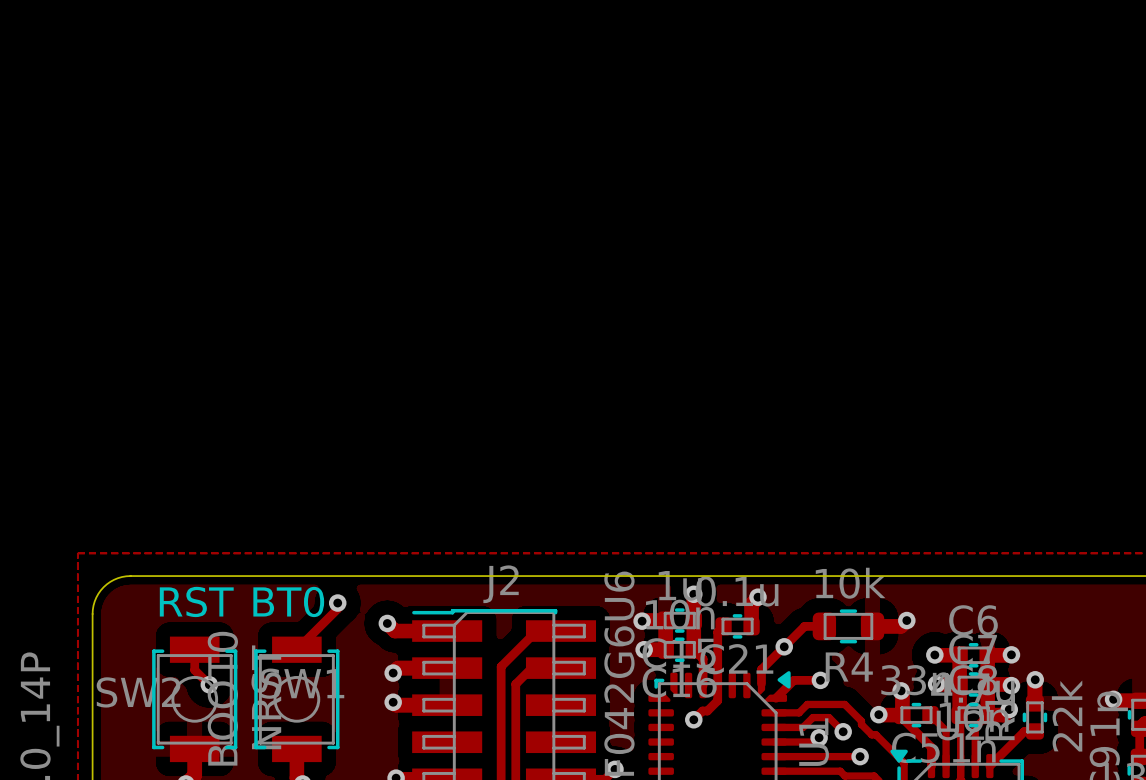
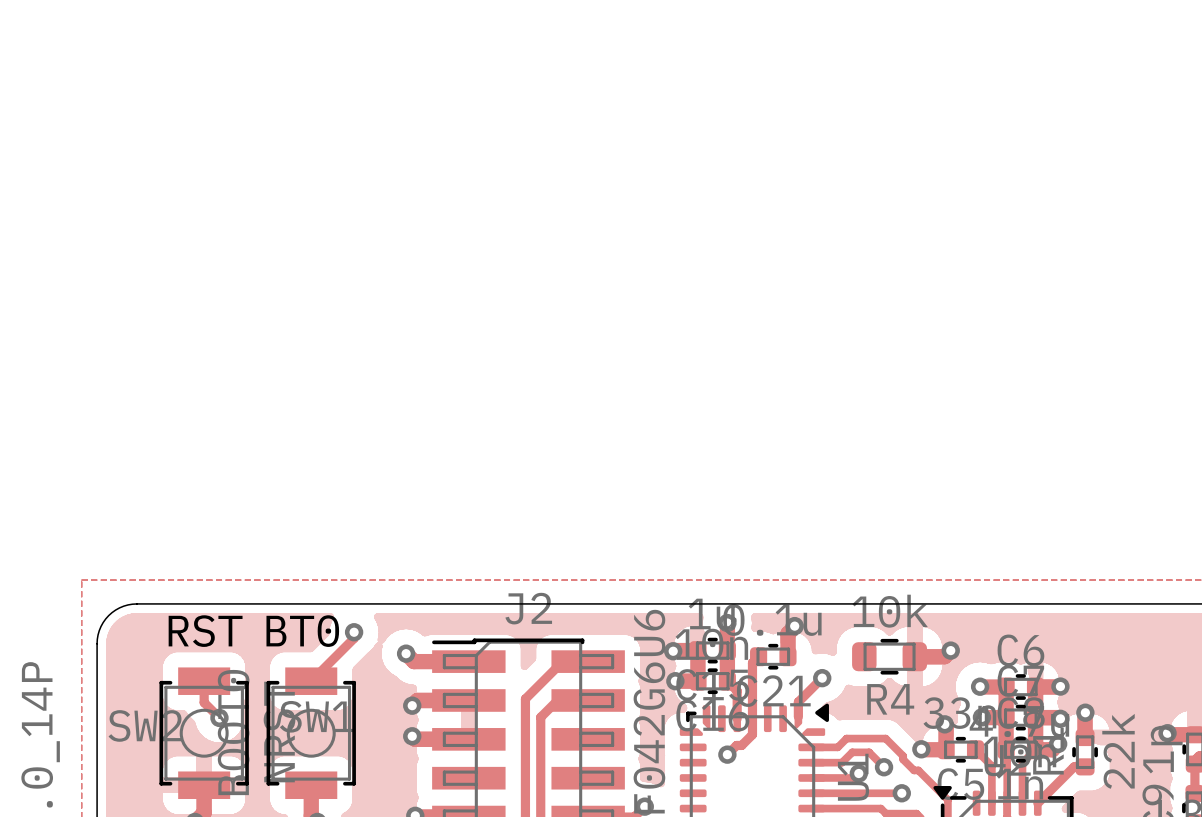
track: (824, 626) (804, 626) (784, 646) -> none
track: (820, 680) (793, 680) (776, 698) -> none
via: (820, 680) -> none
track: (902, 715) (902, 718) (931, 747) (931, 766) -> none

